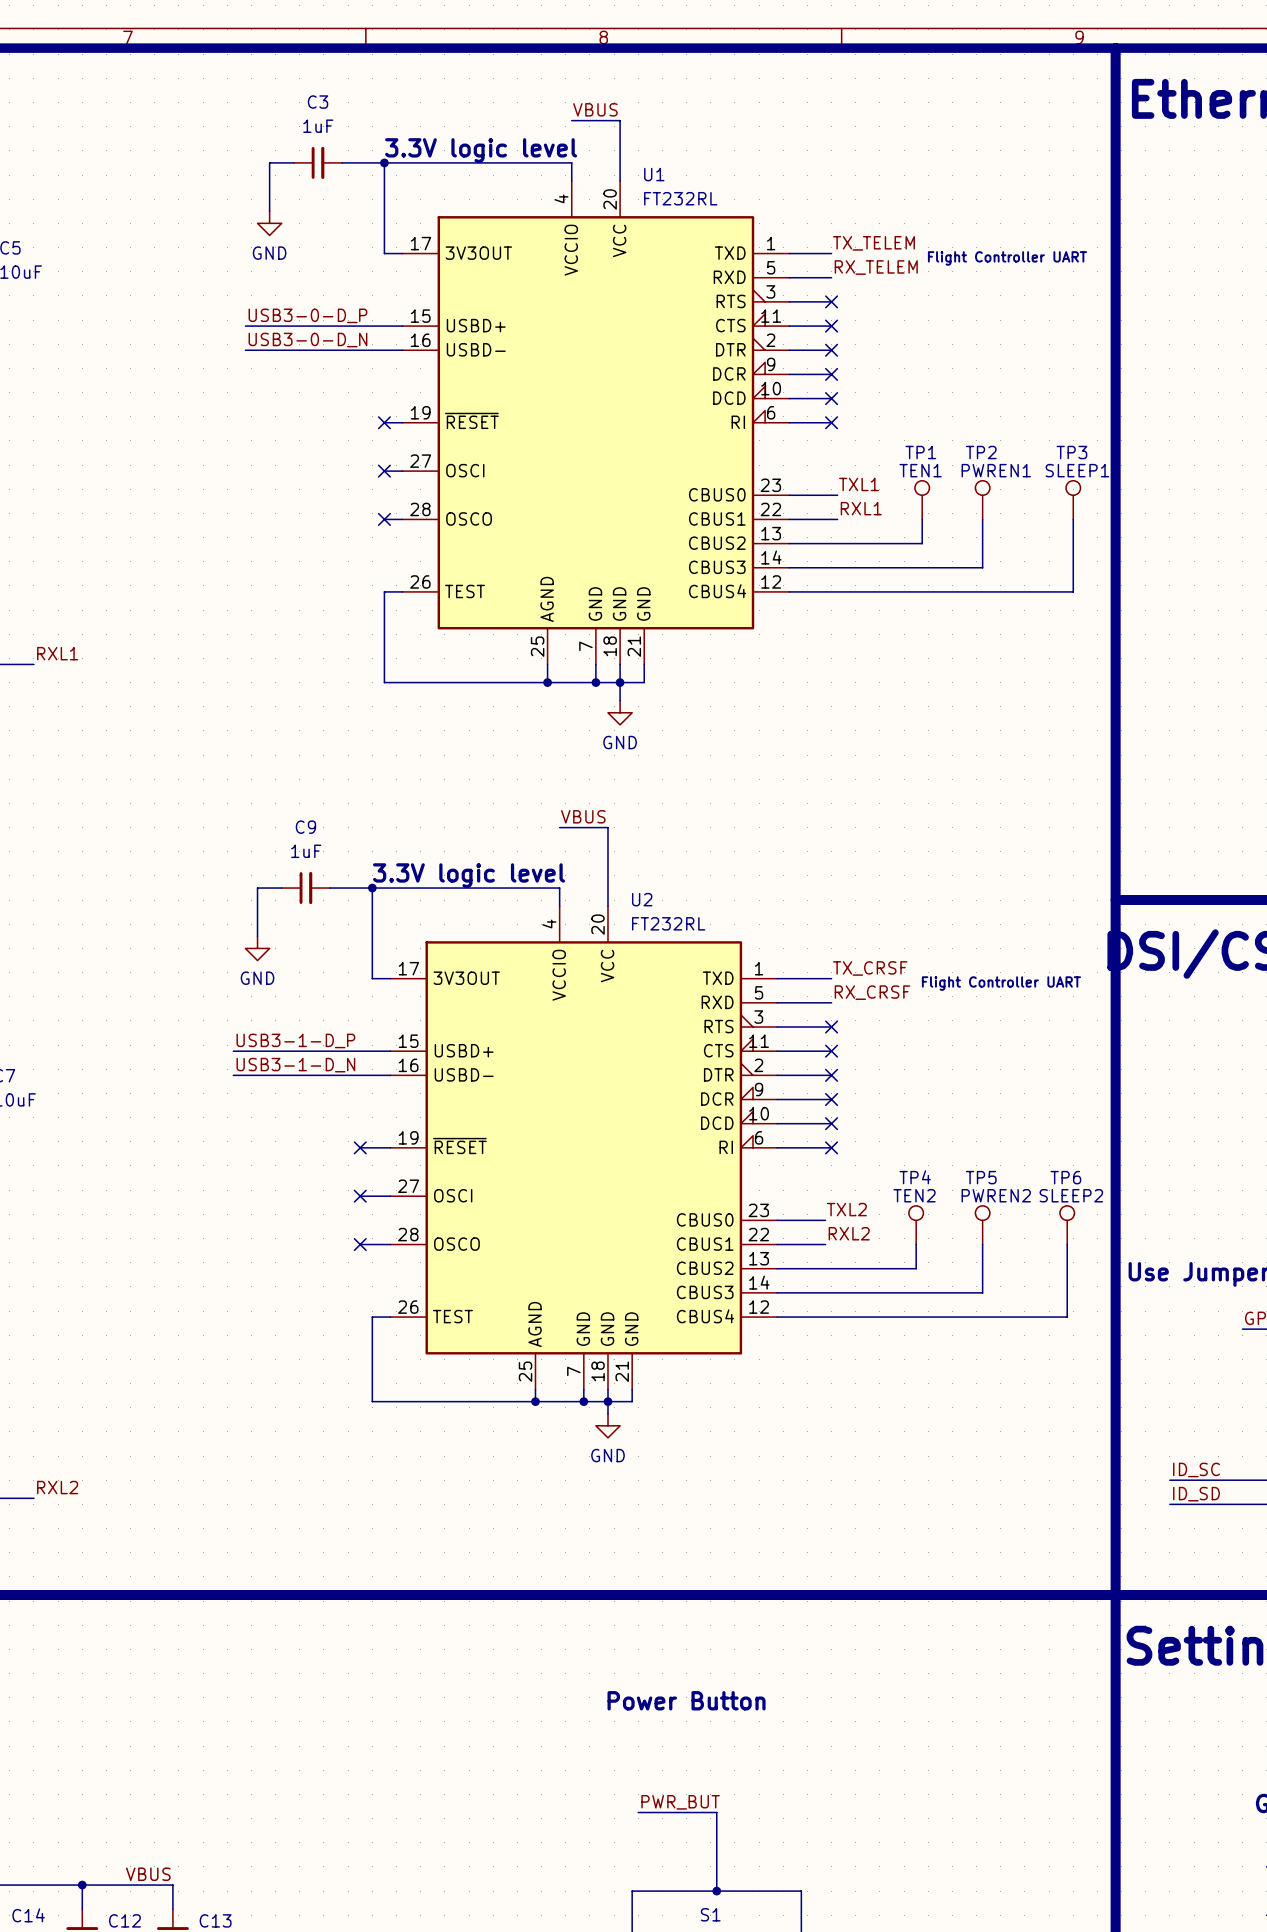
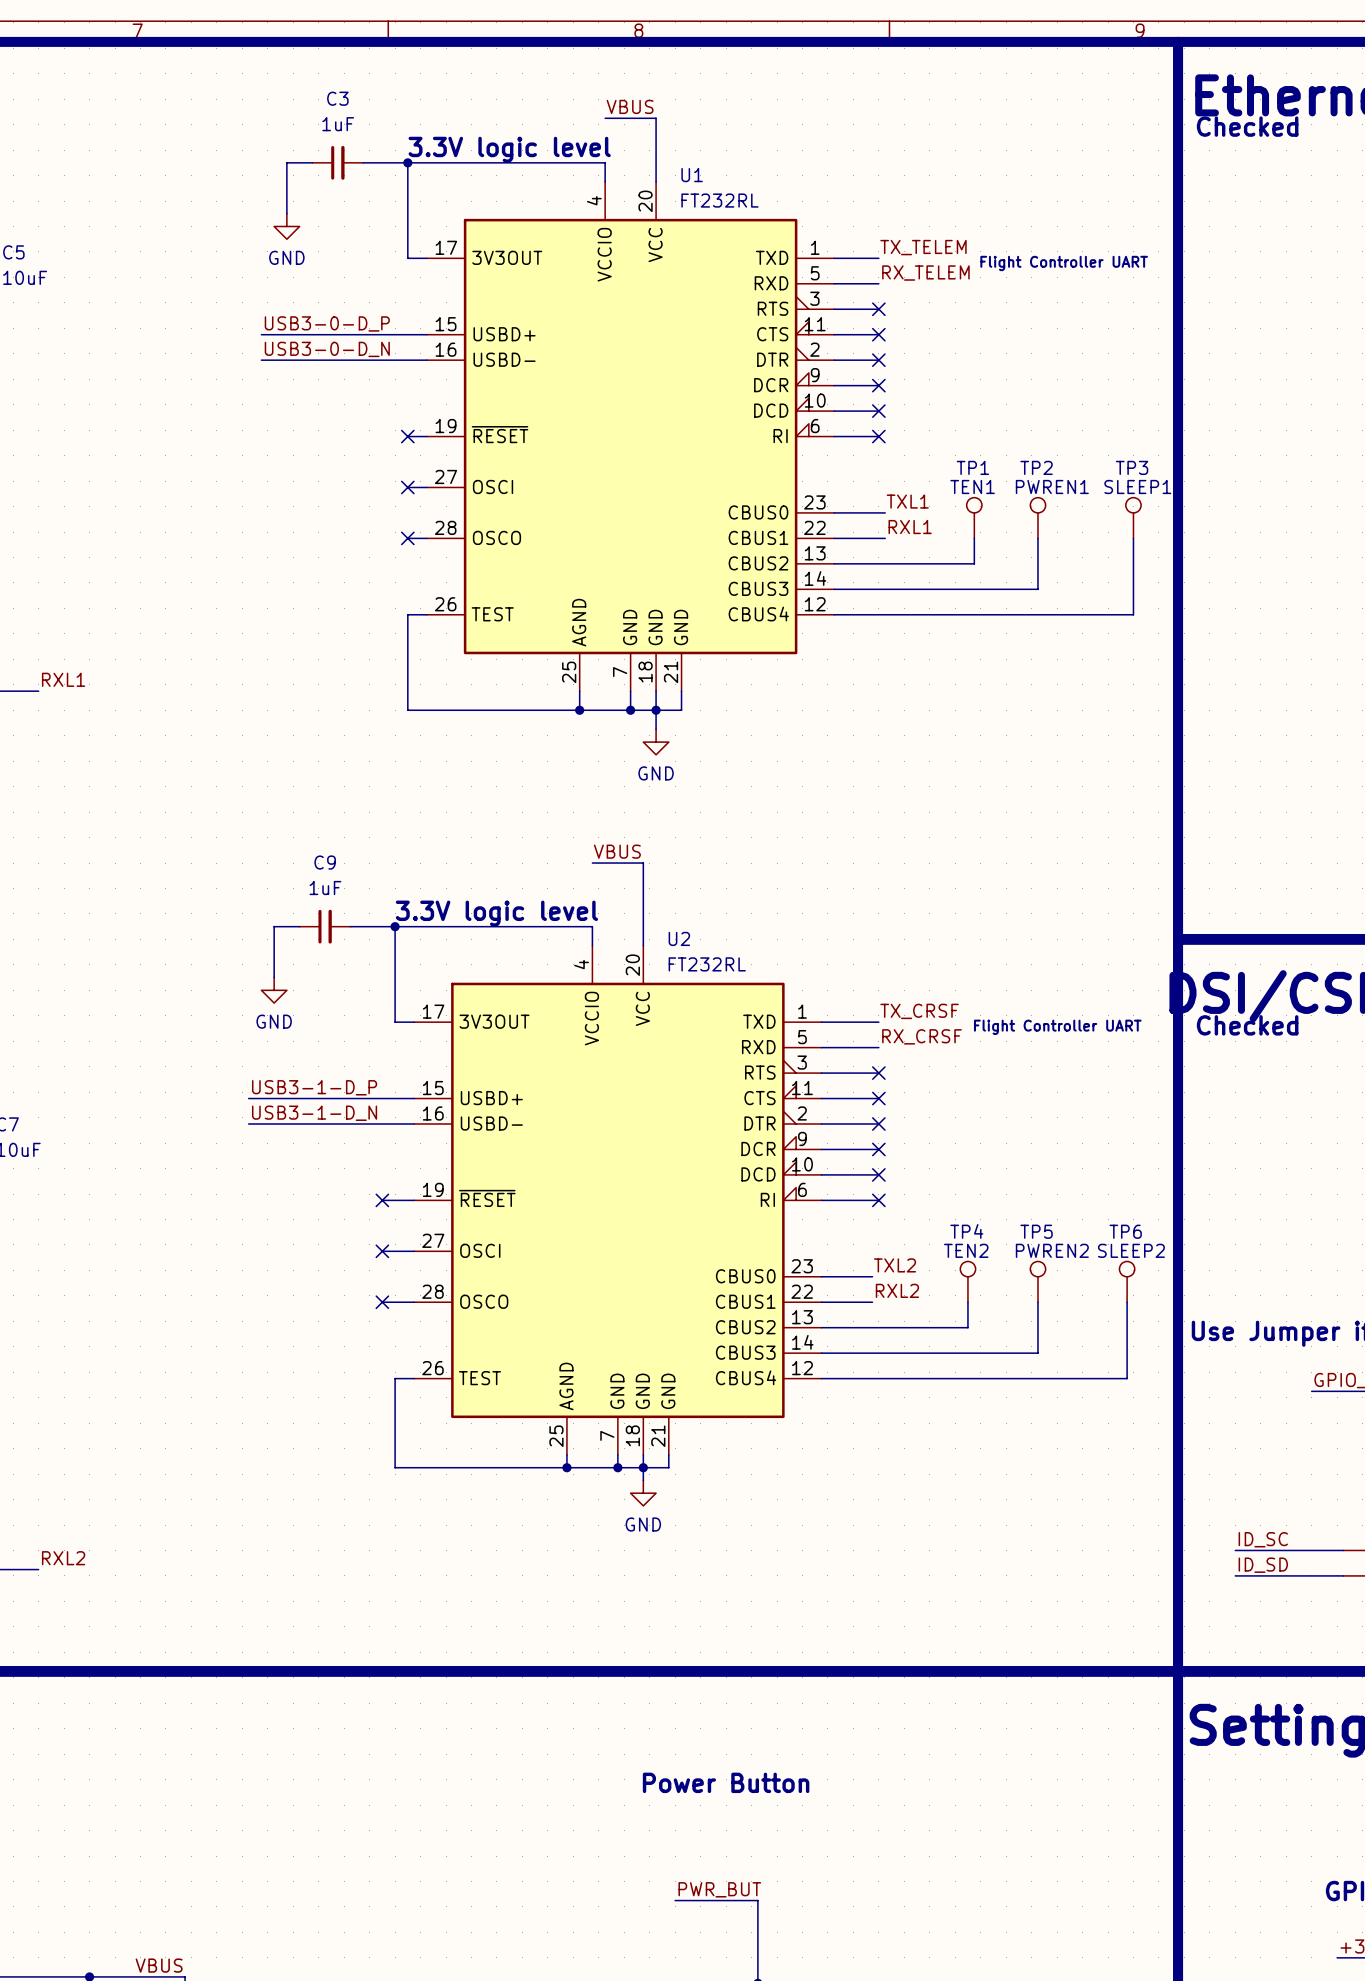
text: none -> Checked (1247, 126)
text: none -> Checked (1247, 1025)

